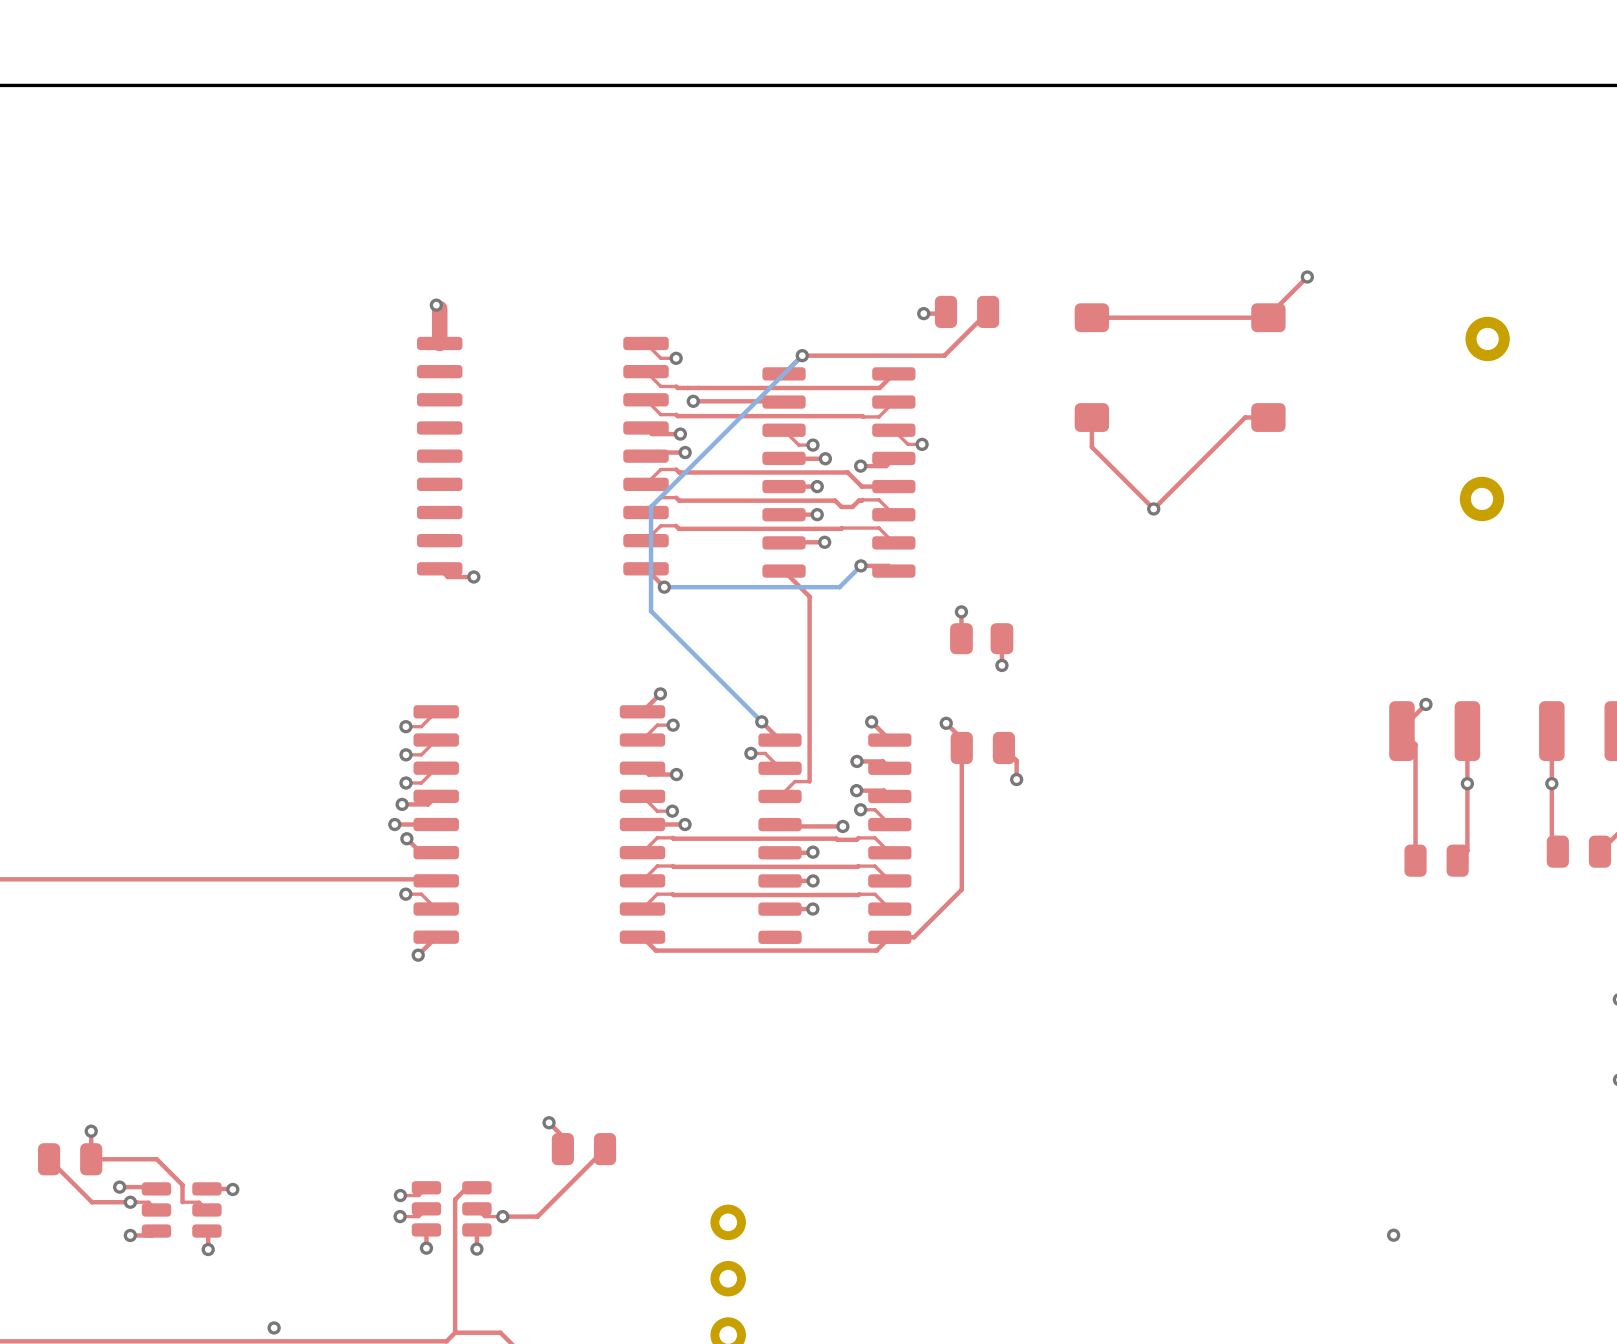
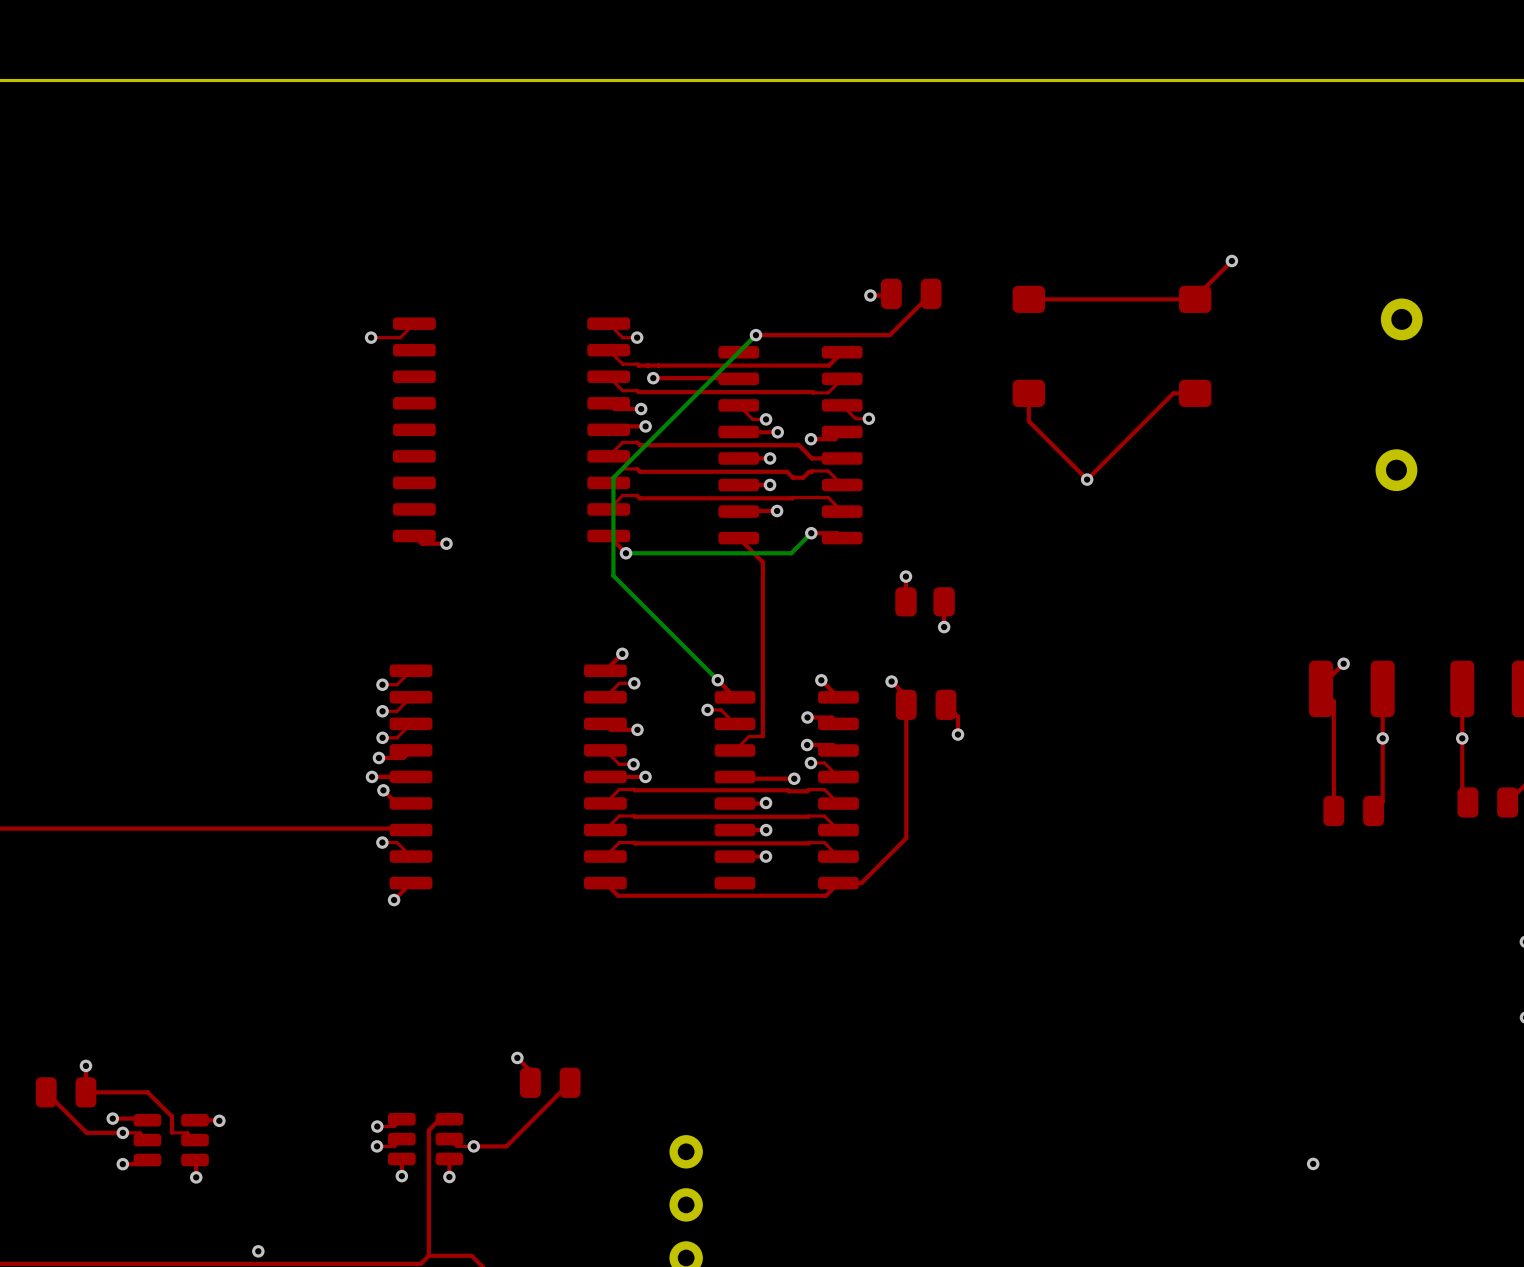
top track: (436, 305) (439, 308) (439, 343) -> (371, 337) (400, 337) (414, 323)
via position: (436, 305) -> (371, 337)

